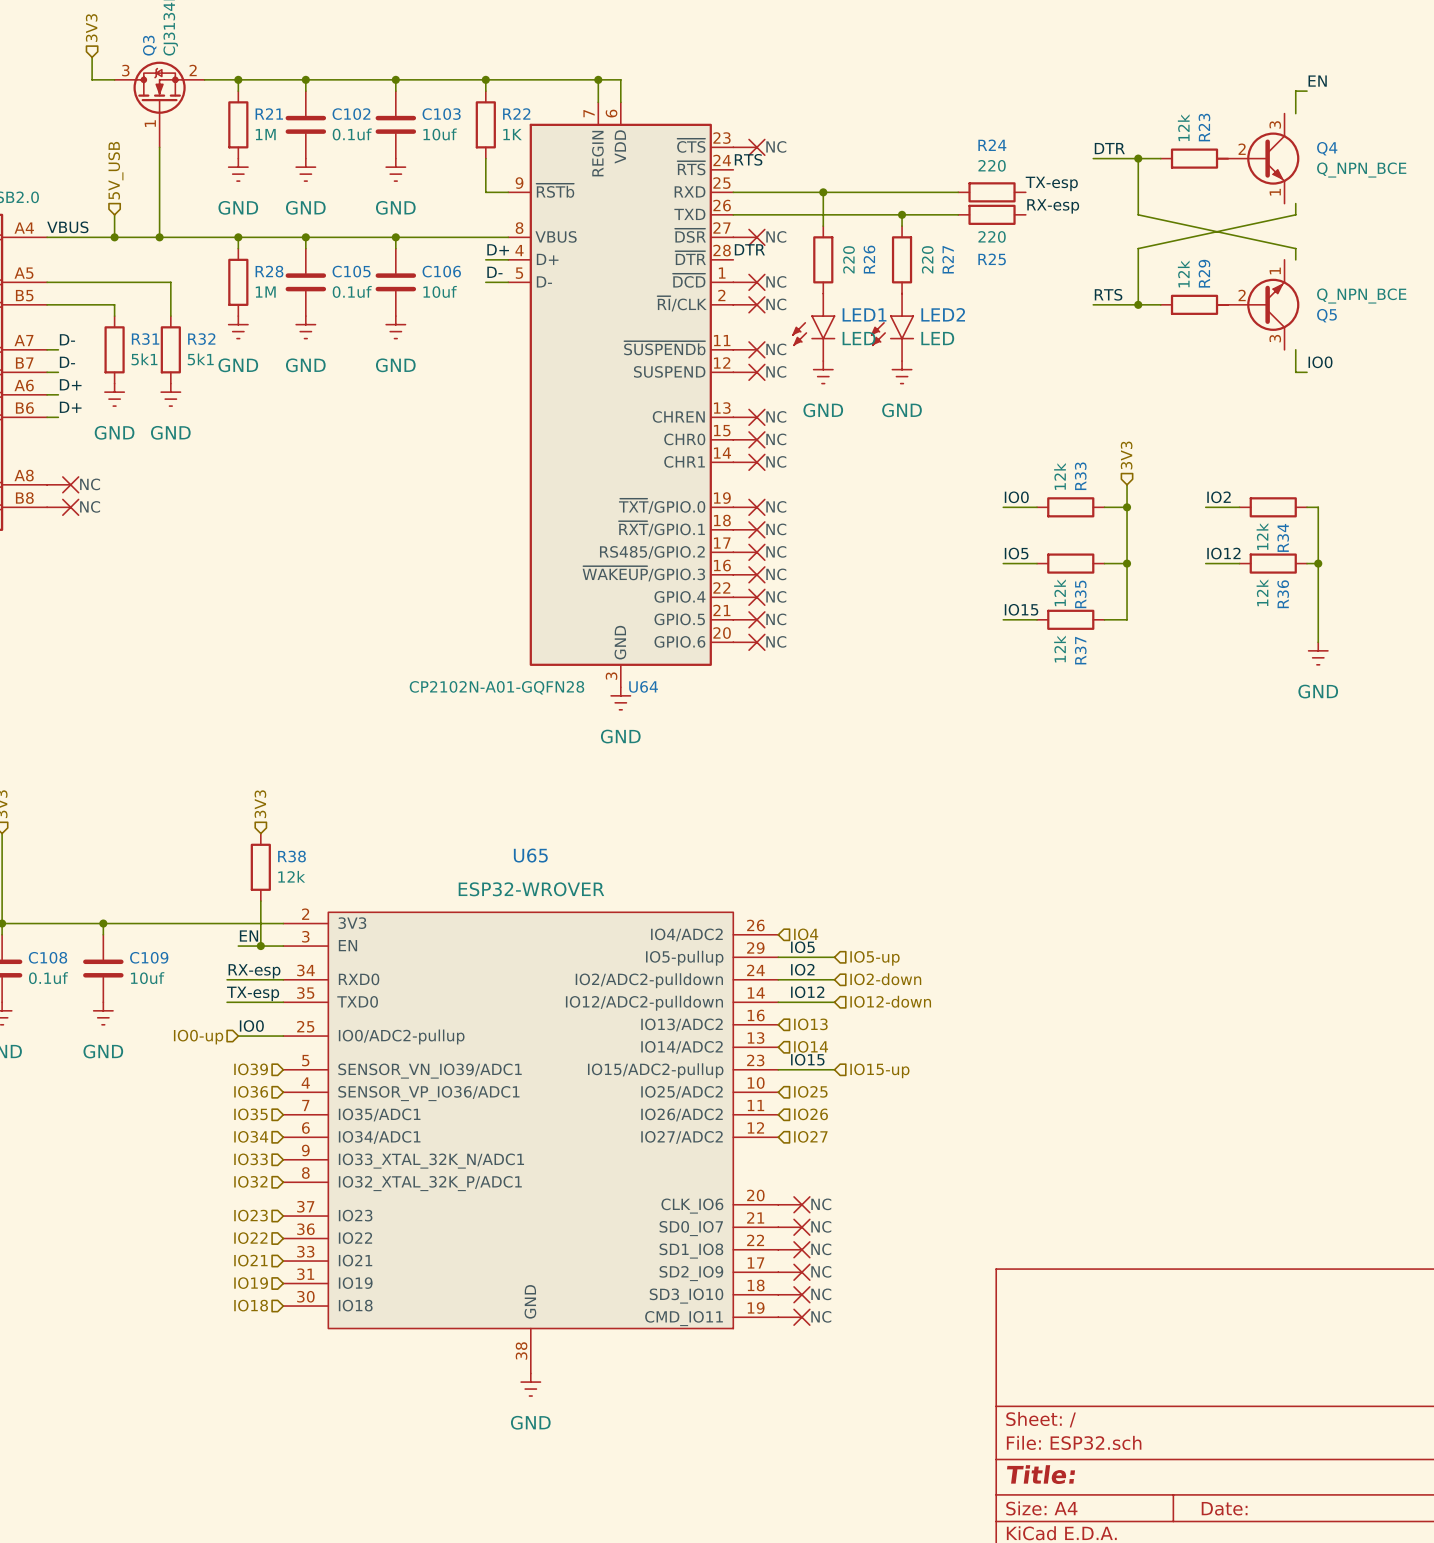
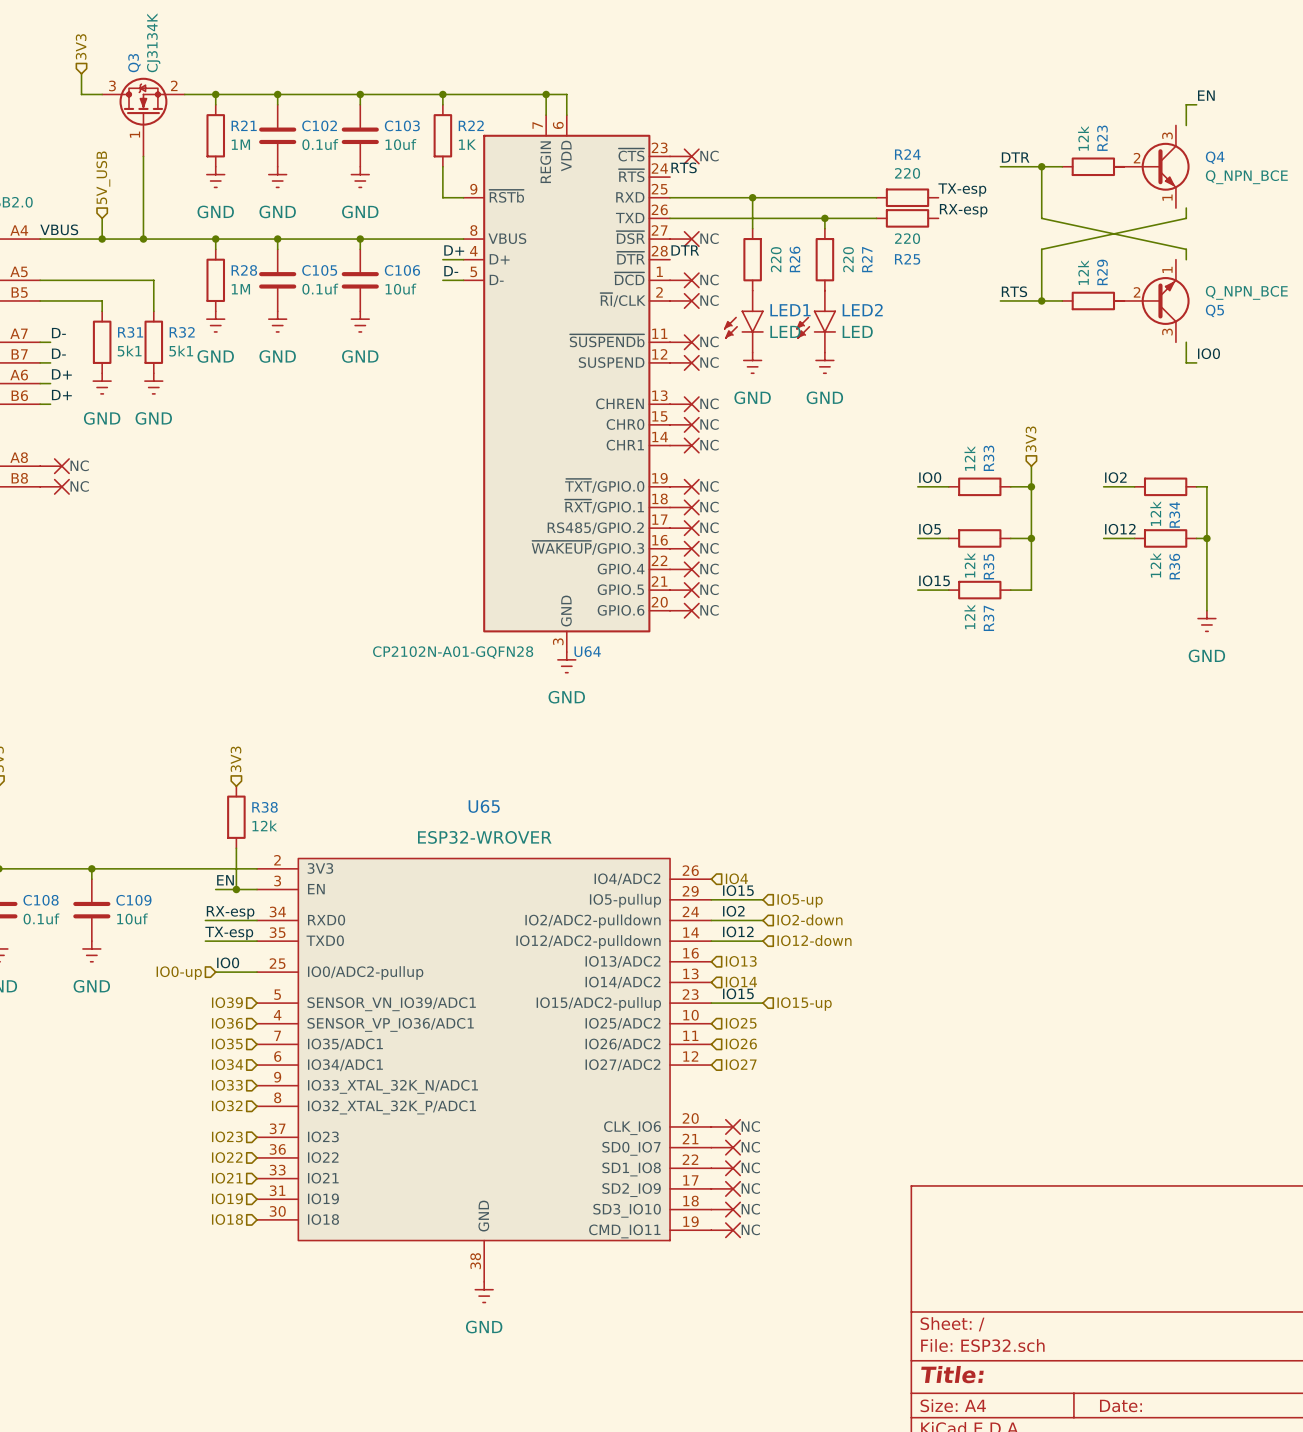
label: IO5 (802, 947) -> IO15 (738, 890)

